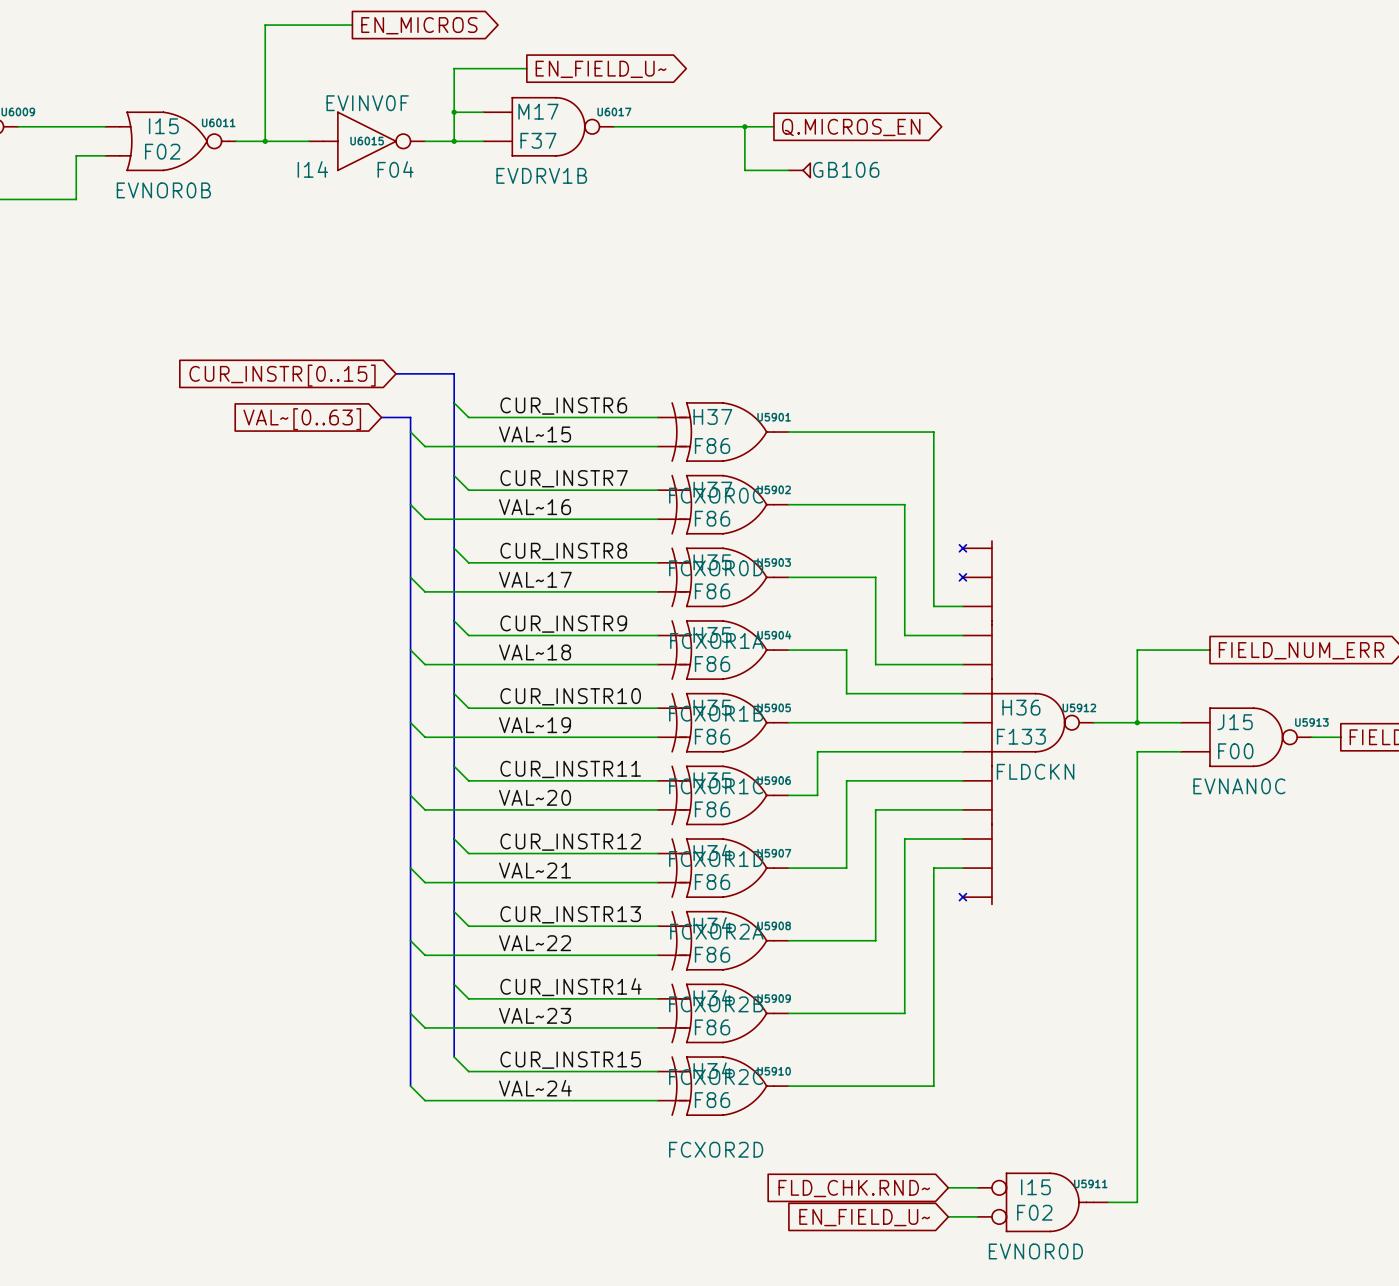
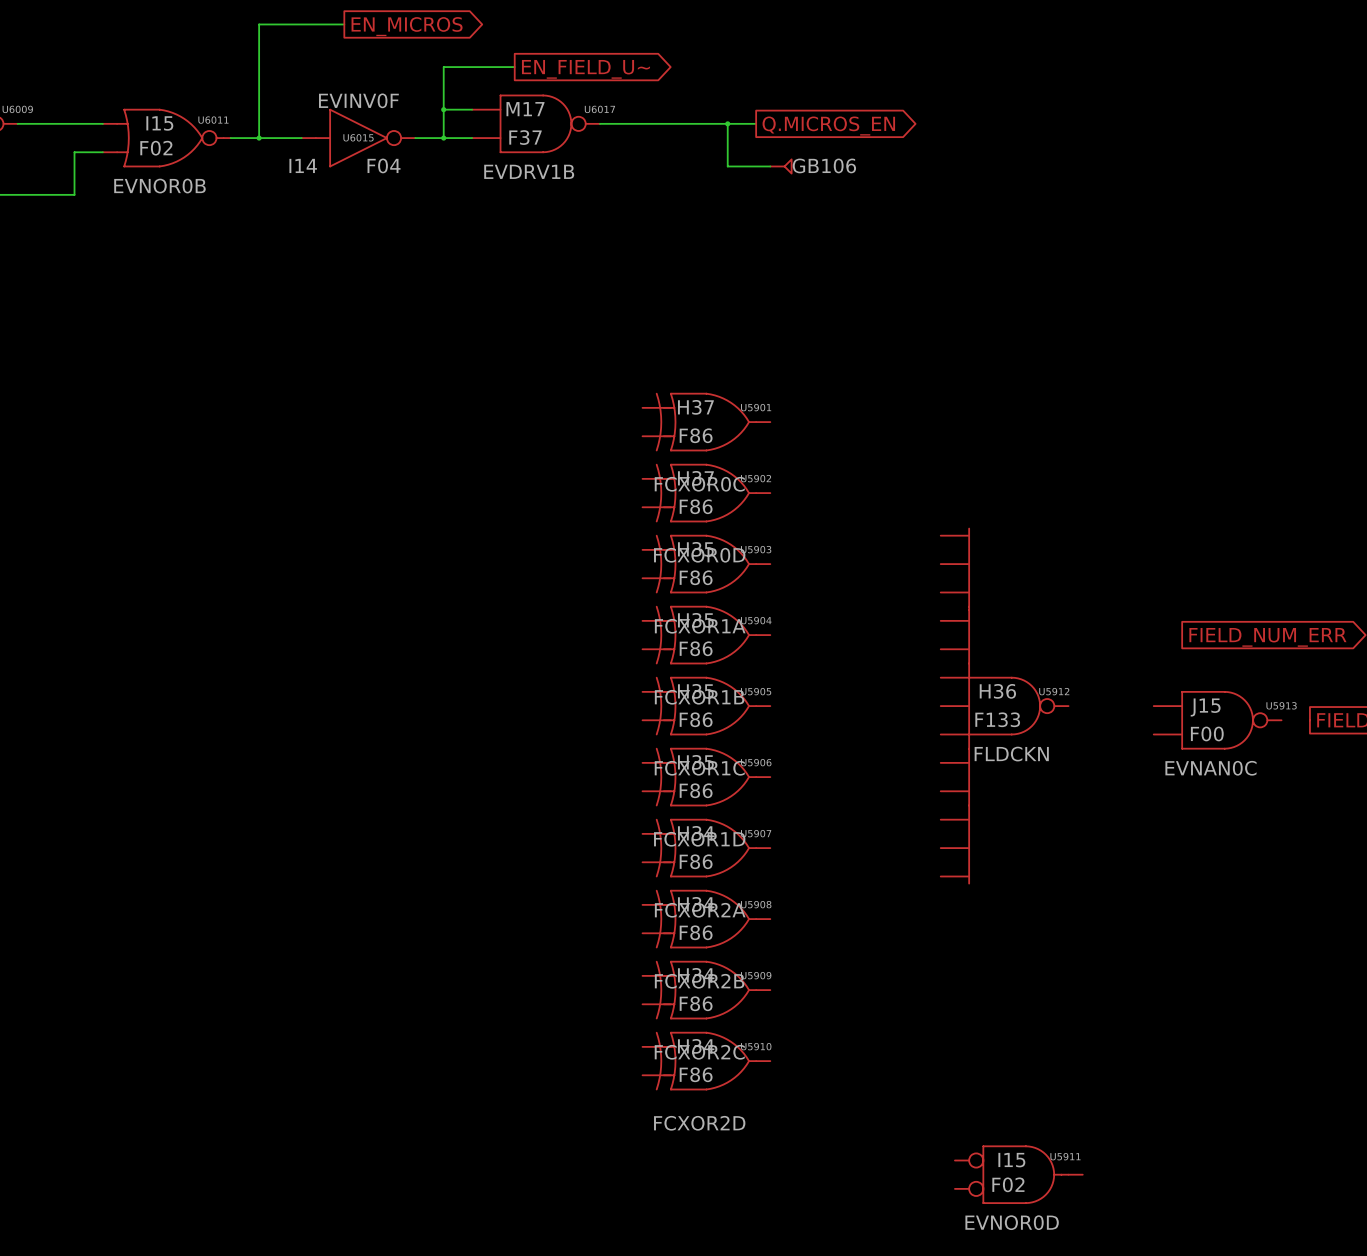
bus: (396, 373) (454, 373) (454, 1057) -> none
global label: CUR_INSTR[0..15] (282, 375) -> none
wire: (454, 402) (468, 417) (657, 417) -> none
label: CUR_INSTR6 (563, 406) -> none
bus: (381, 417) (410, 417) (410, 1086) -> none
global label: VAL~[0..63] (302, 419) -> none
wire: (410, 432) (425, 446) (657, 446) -> none
wire: (788, 432) (933, 432) (933, 606) (962, 606) -> none
label: VAL~15 (535, 434) -> none
wire: (454, 475) (468, 490) (657, 490) -> none
label: CUR_INSTR7 (564, 478) -> none
wire: (410, 504) (425, 519) (657, 519) -> none
wire: (788, 504) (904, 504) (904, 635) (962, 635) -> none
label: VAL~16 (535, 507) -> none
wire: (454, 548) (468, 562) (657, 562) -> none
no-connect mark: (962, 548) -> none
label: CUR_INSTR8 (563, 551) -> none
wire: (410, 577) (425, 591) (657, 591) -> none
wire: (788, 577) (875, 577) (875, 664) (962, 664) -> none
no-connect mark: (962, 577) -> none
label: VAL~17 (535, 579) -> none
wire: (454, 620) (468, 635) (657, 635) -> none
label: CUR_INSTR9 (563, 624) -> none
wire: (410, 650) (425, 664) (657, 664) -> none
wire: (788, 650) (846, 650) (846, 693) (962, 693) -> none
wire: (1209, 650) (1137, 650) (1137, 722) -> none
label: VAL~18 (535, 652) -> none
wire: (454, 693) (468, 708) (657, 708) -> none
label: CUR_INSTR10 (570, 696) -> none
wire: (410, 722) (425, 737) (657, 737) -> none
wire: (788, 722) (962, 722) -> none
wire: (1093, 722) (1180, 722) -> none
junction: (1137, 722) -> none
label: VAL~19 (535, 725) -> none
wire: (1311, 737) (1340, 737) -> none
wire: (962, 751) (817, 751) (817, 795) (788, 795) -> none
wire: (1180, 751) (1137, 751) (1137, 1202) (1108, 1202) -> none
wire: (454, 766) (468, 780) (657, 780) -> none
label: CUR_INSTR11 (570, 769) -> none
wire: (962, 780) (846, 780) (846, 868) (788, 868) -> none
wire: (410, 795) (425, 809) (657, 809) -> none
label: VAL~20 (535, 797) -> none
wire: (962, 809) (875, 809) (875, 940) (788, 940) -> none
wire: (454, 839) (468, 853) (657, 853) -> none
wire: (962, 839) (904, 839) (904, 1013) (788, 1013) -> none
label: CUR_INSTR12 (570, 842) -> none
wire: (410, 868) (425, 882) (657, 882) -> none
wire: (962, 868) (933, 868) (933, 1086) (788, 1086) -> none
label: VAL~21 (535, 870) -> none
no-connect mark: (962, 897) -> none
wire: (454, 911) (468, 926) (657, 926) -> none
label: CUR_INSTR13 (570, 914) -> none
wire: (410, 940) (425, 955) (657, 955) -> none
label: VAL~22 (535, 943) -> none
wire: (454, 984) (468, 998) (657, 998) -> none
label: CUR_INSTR14 (571, 987) -> none
wire: (410, 1013) (425, 1027) (657, 1027) -> none
label: VAL~23 (535, 1015) -> none
wire: (454, 1057) (468, 1071) (657, 1071) -> none
label: CUR_INSTR15 (570, 1060) -> none
wire: (410, 1086) (425, 1100) (657, 1100) -> none
label: VAL~24 (535, 1088) -> none
wire: (948, 1187) (977, 1187) -> none
global label: FLD_CHK.RND~ (854, 1188) -> none
wire: (948, 1216) (977, 1216) -> none
global label: EN_FIELD_U~ (864, 1217) -> none

